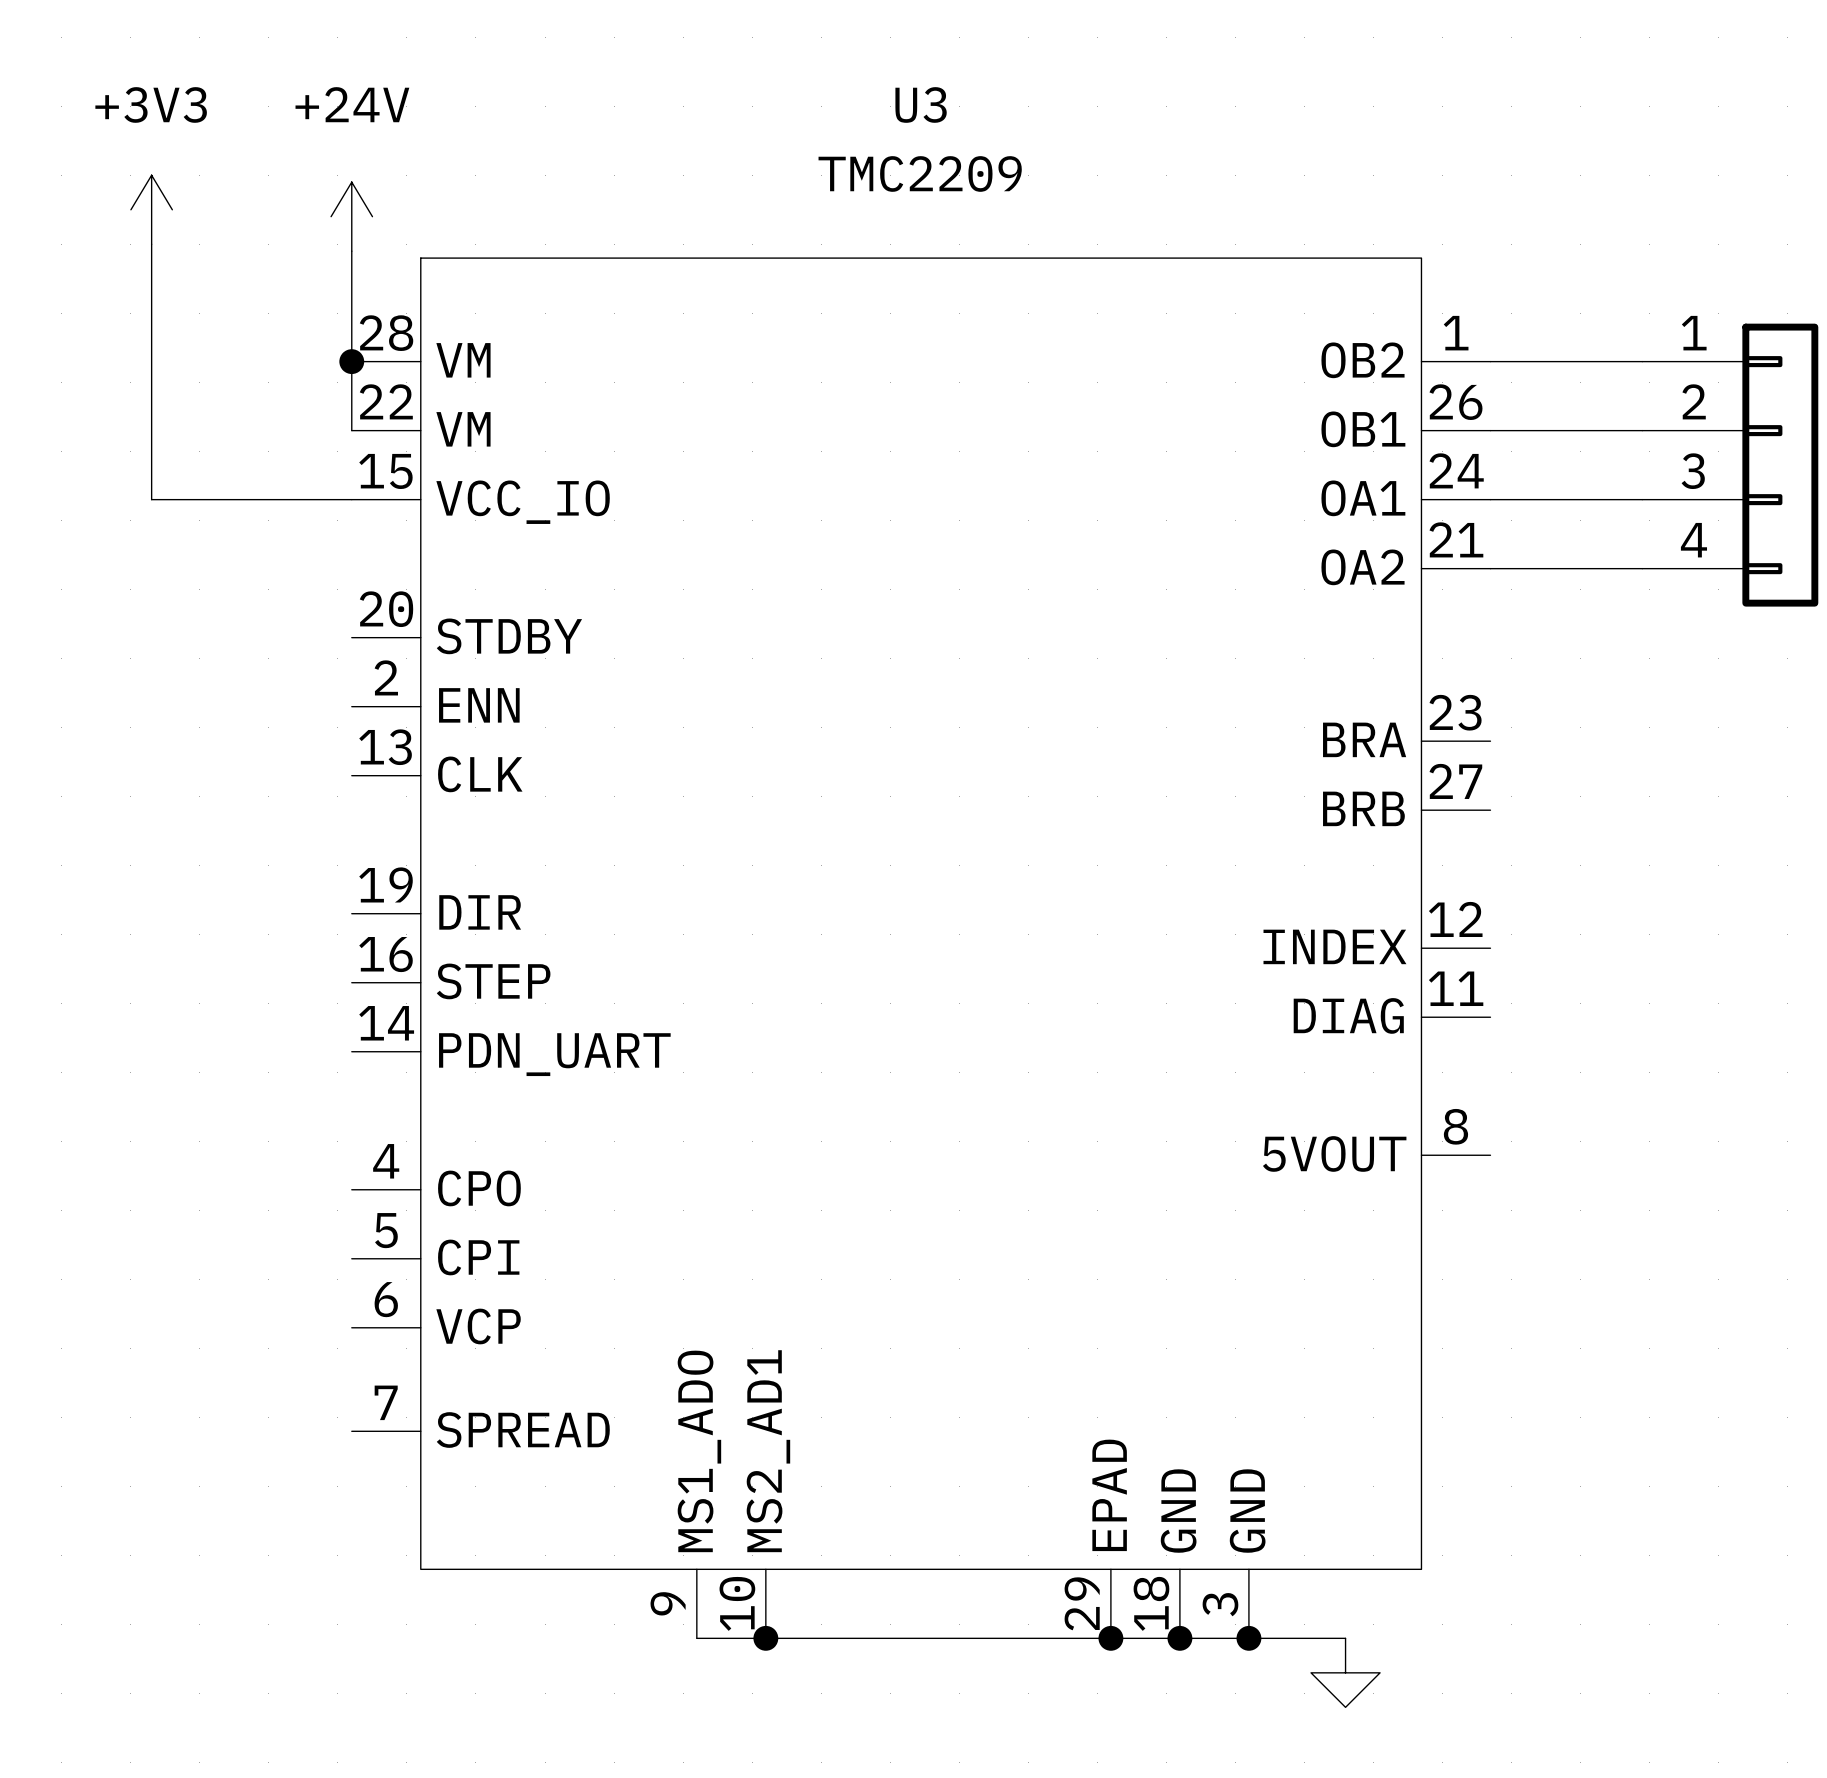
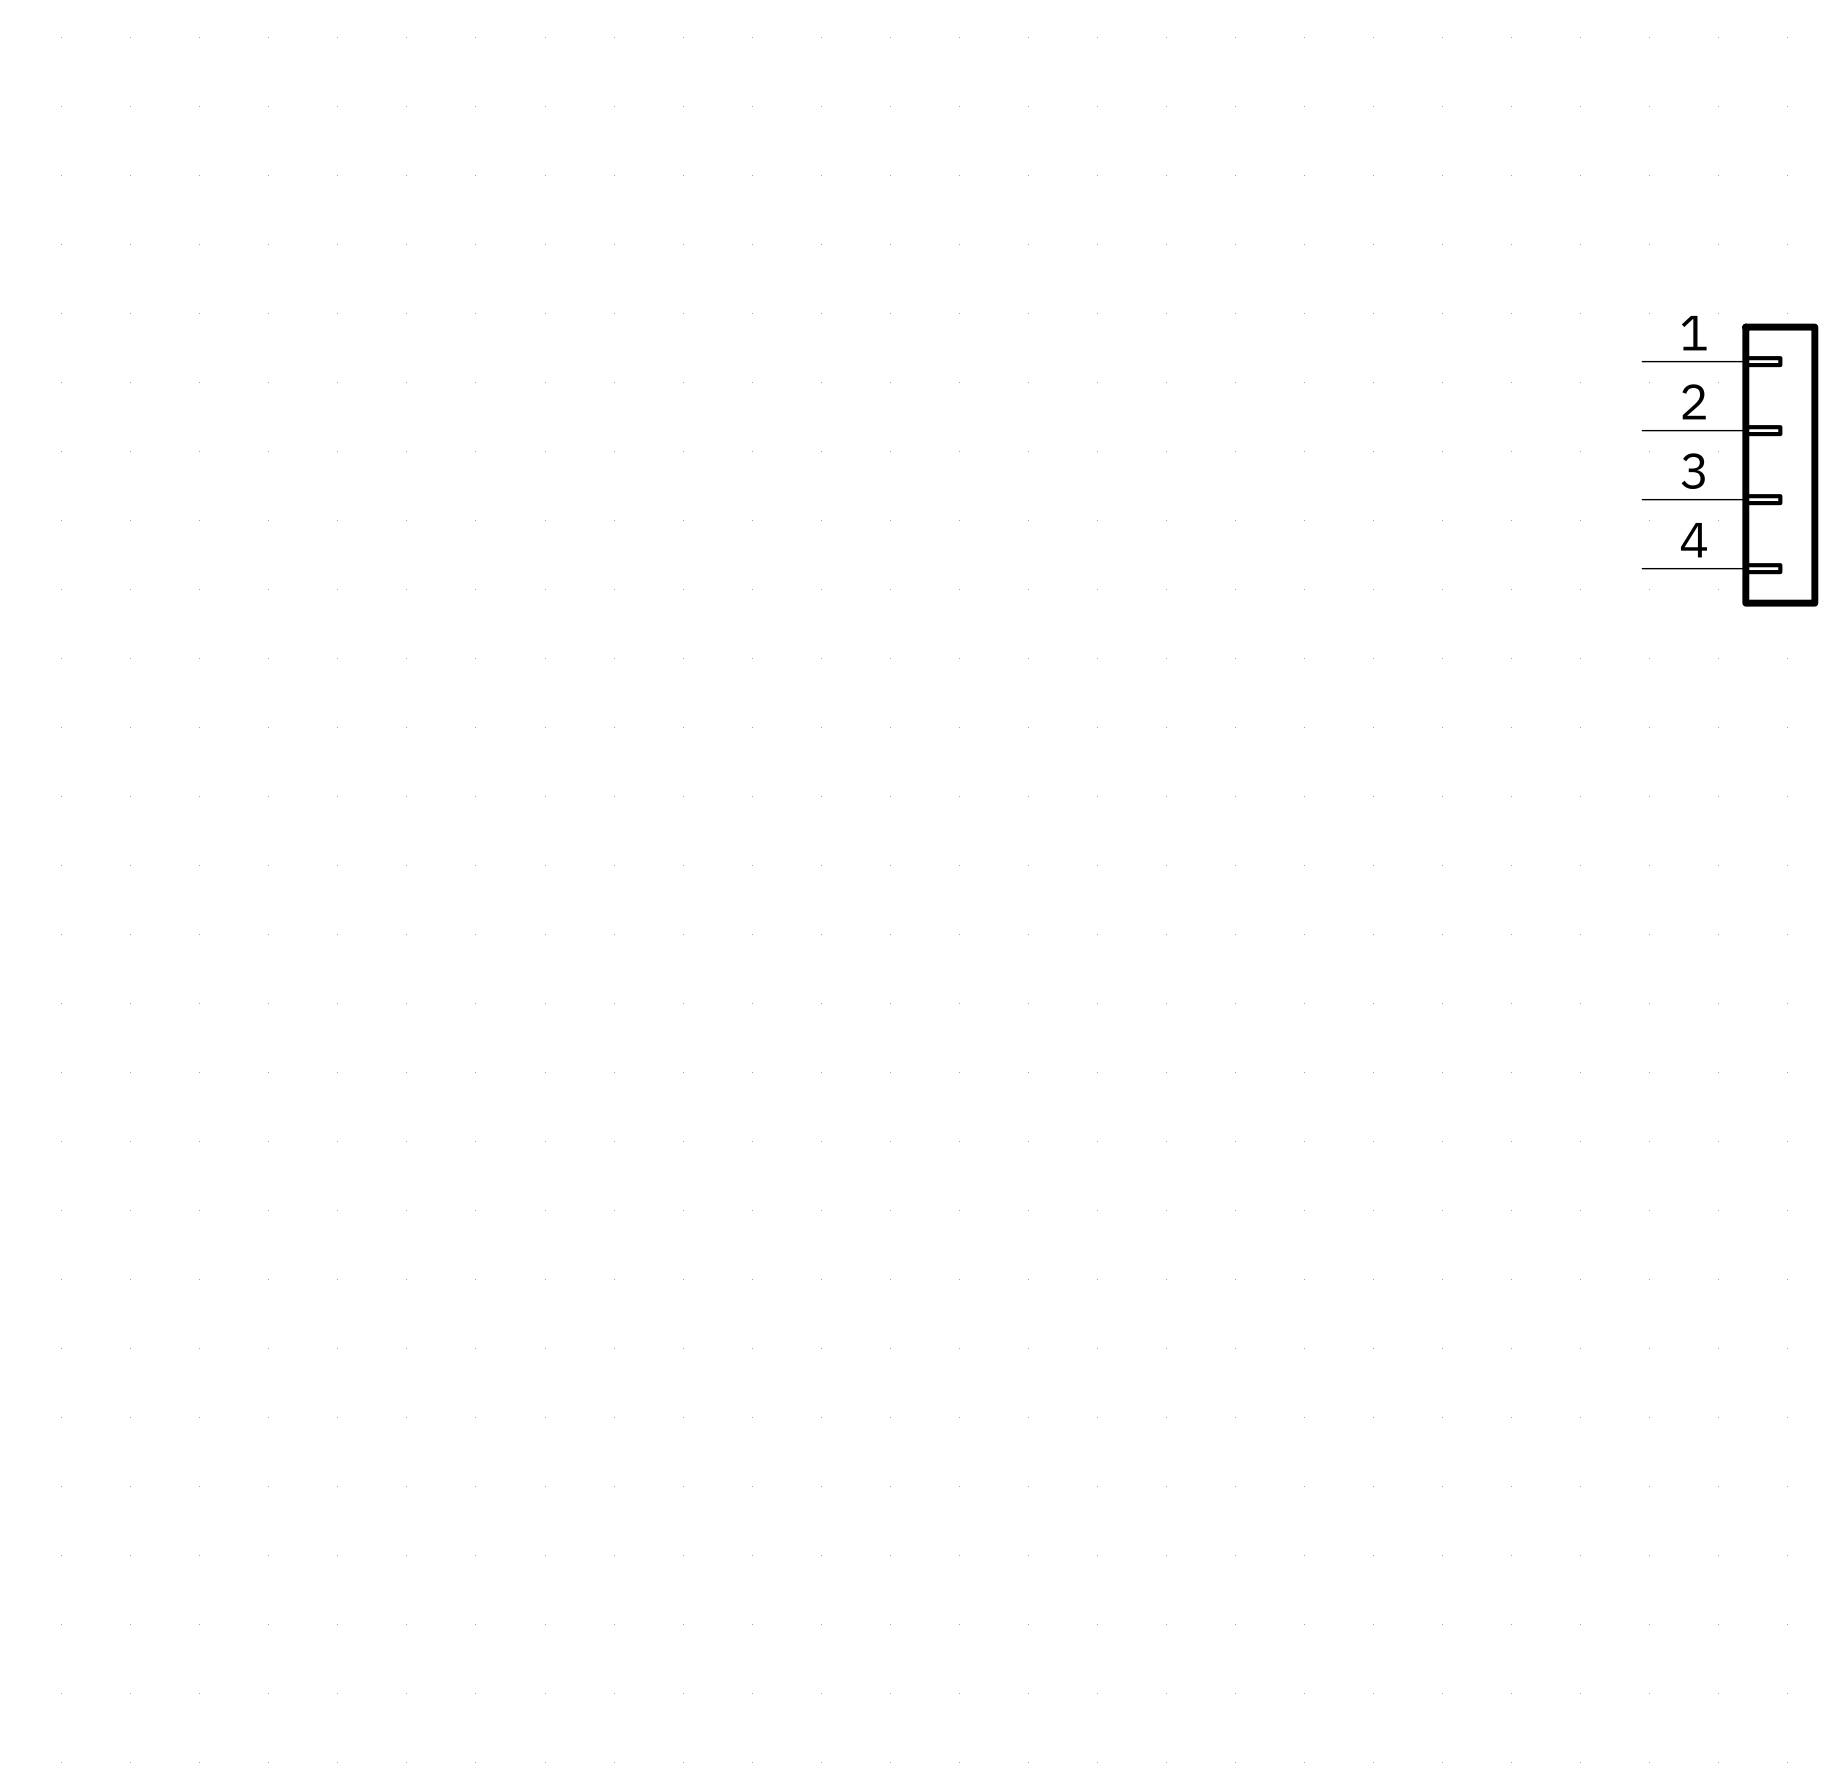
power symbol: +3V3 (151, 209) -> none
power symbol: +24V (351, 216) -> none
wire: (151, 244) (151, 499) (351, 499) -> none
wire: (351, 251) (351, 430) -> none
junction: (351, 361) -> none
wire: (1490, 361) (1642, 361) -> none
wire: (1490, 430) (1642, 430) -> none
wire: (1490, 499) (1642, 499) -> none
wire: (1490, 568) (1642, 568) -> none
U3: TMC2209 (921, 948) -> none
wire: (696, 1638) (1345, 1638) -> none
junction: (765, 1638) -> none
junction: (1110, 1638) -> none
junction: (1179, 1638) -> none
junction: (1248, 1638) -> none
power symbol: (1345, 1672) -> none

